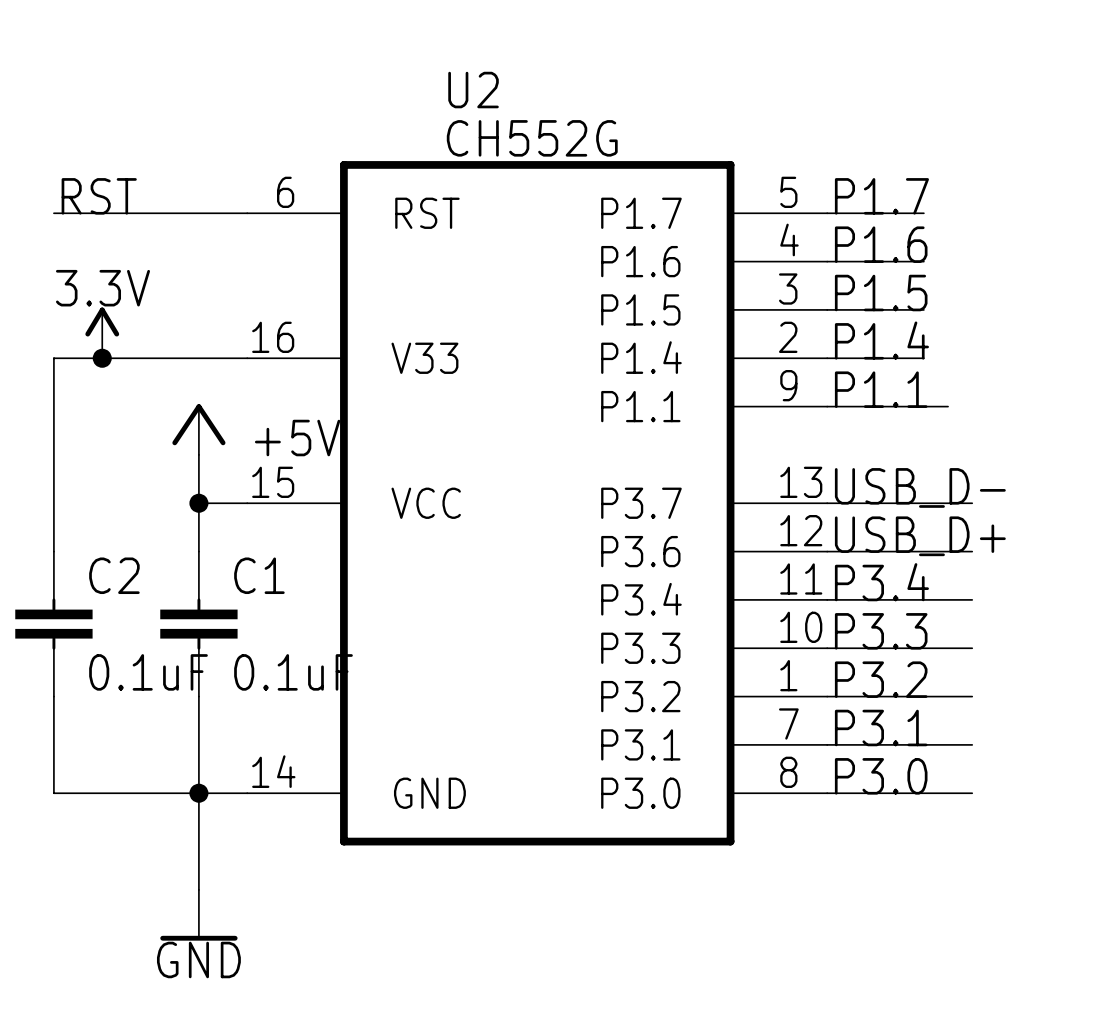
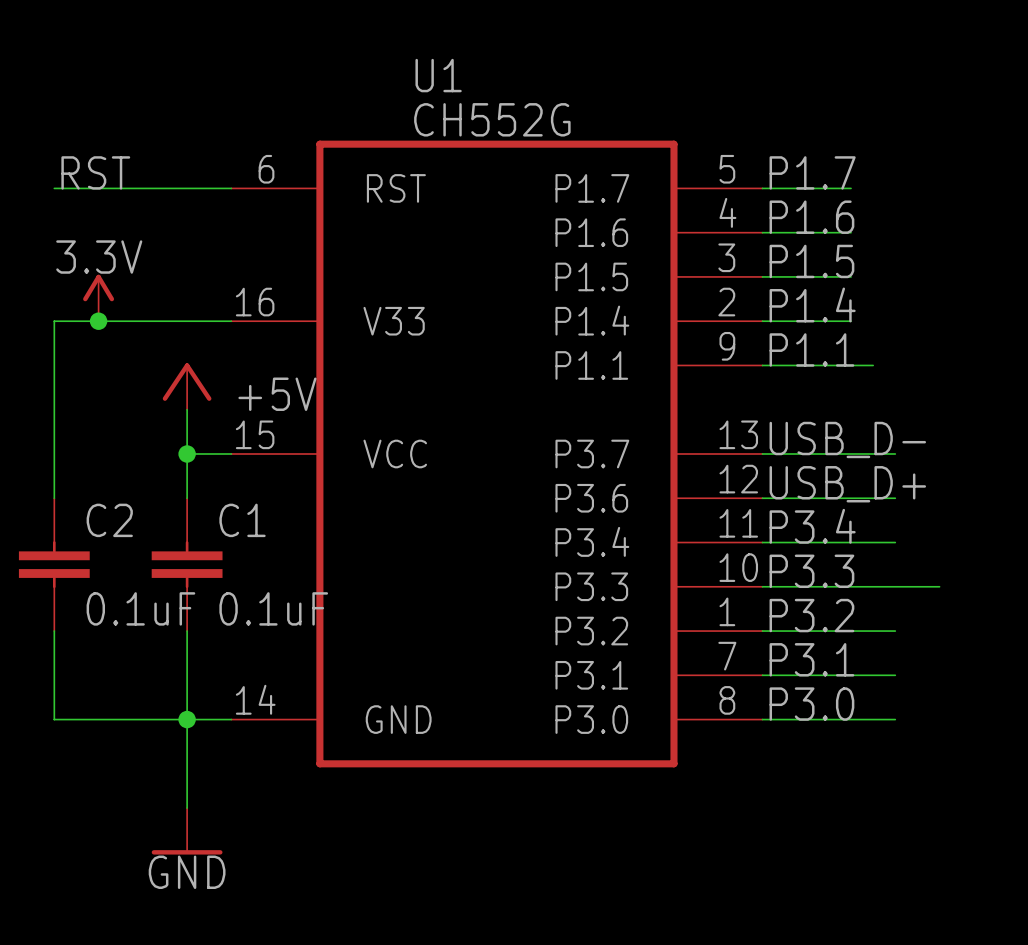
U2 name: U2 (473, 90) -> U1 (438, 75)
wire: none -> (895, 586) (939, 586)

